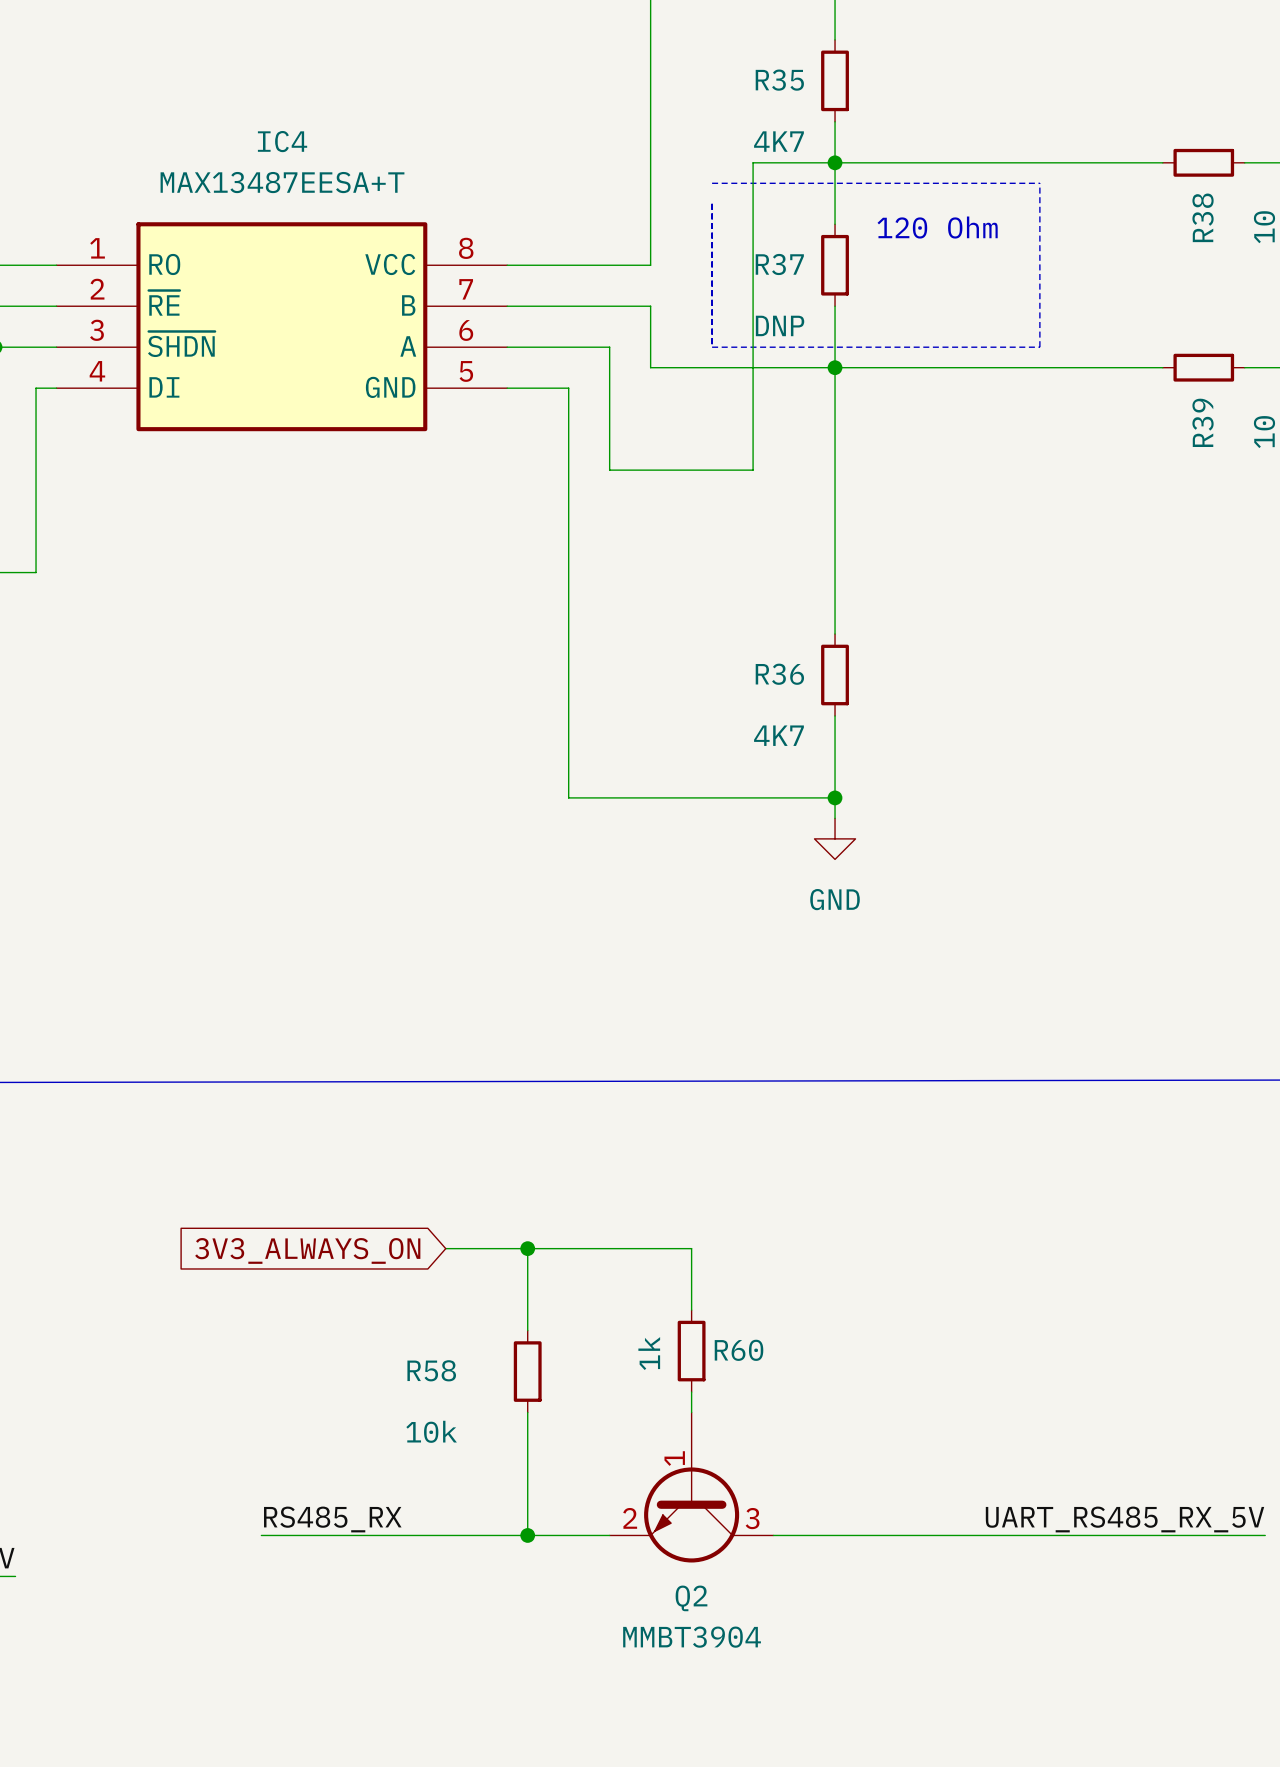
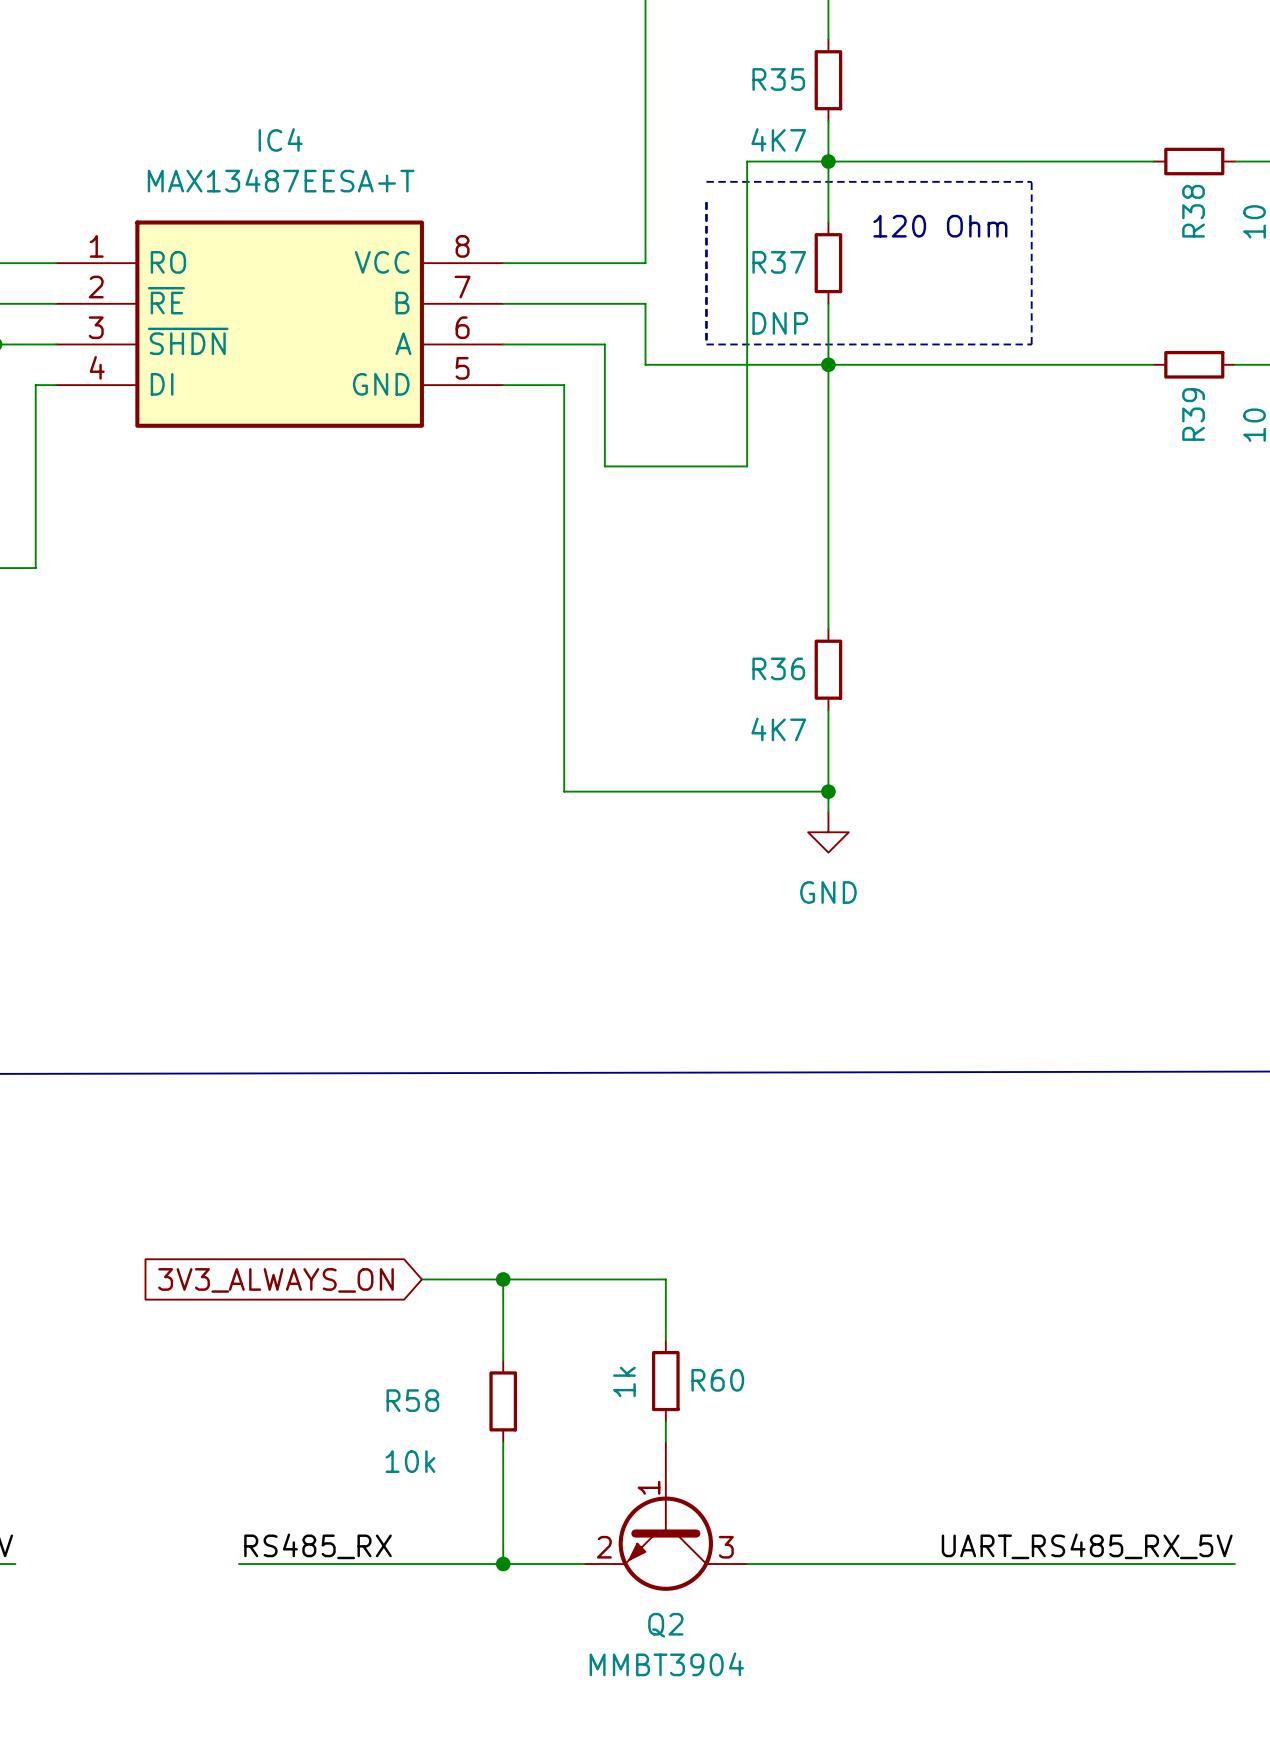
wire: (445, 1248) (691, 1248) (691, 1310) -> (421, 1279) (665, 1279) (665, 1340)
wire: (527, 1248) (527, 1330) -> (503, 1279) (503, 1360)
junction position: (527, 1248) -> (503, 1279)
global label position: 3V3_ALWAYS_ON (307, 1250) -> 3V3_ALWAYS_ON (275, 1280)
R60 position: (691, 1351) -> (665, 1381)
R58 position: (527, 1371) -> (503, 1401)
wire: (691, 1392) (691, 1412) -> (665, 1421) (665, 1442)
wire: (527, 1412) (527, 1535) -> (503, 1442) (503, 1564)
Q2 position: (691, 1487) -> (665, 1516)
label position: RS485_RX (332, 1519) -> RS485_RX (318, 1546)
label position: UART_RS485_RX_5V (1125, 1519) -> UART_RS485_RX_5V (1087, 1546)
wire: (261, 1535) (609, 1535) -> (238, 1564) (584, 1564)
junction position: (527, 1535) -> (503, 1564)
wire: (773, 1535) (1265, 1535) -> (747, 1564) (1234, 1564)

